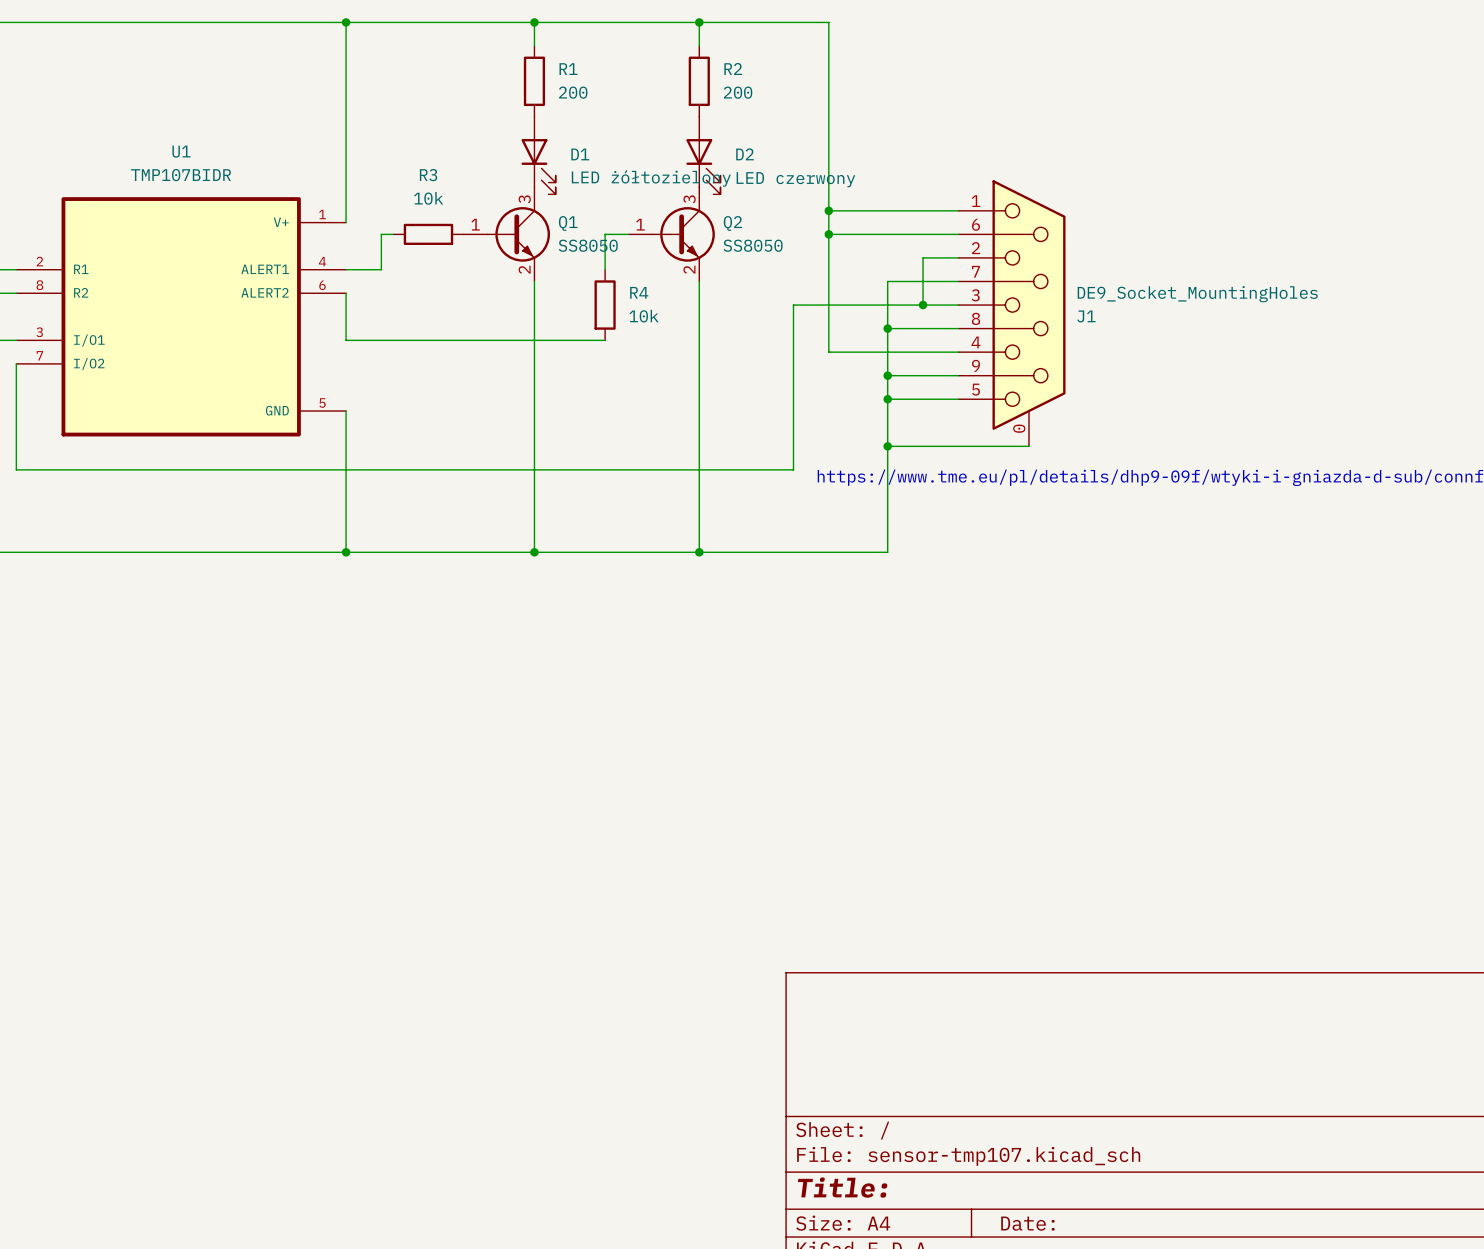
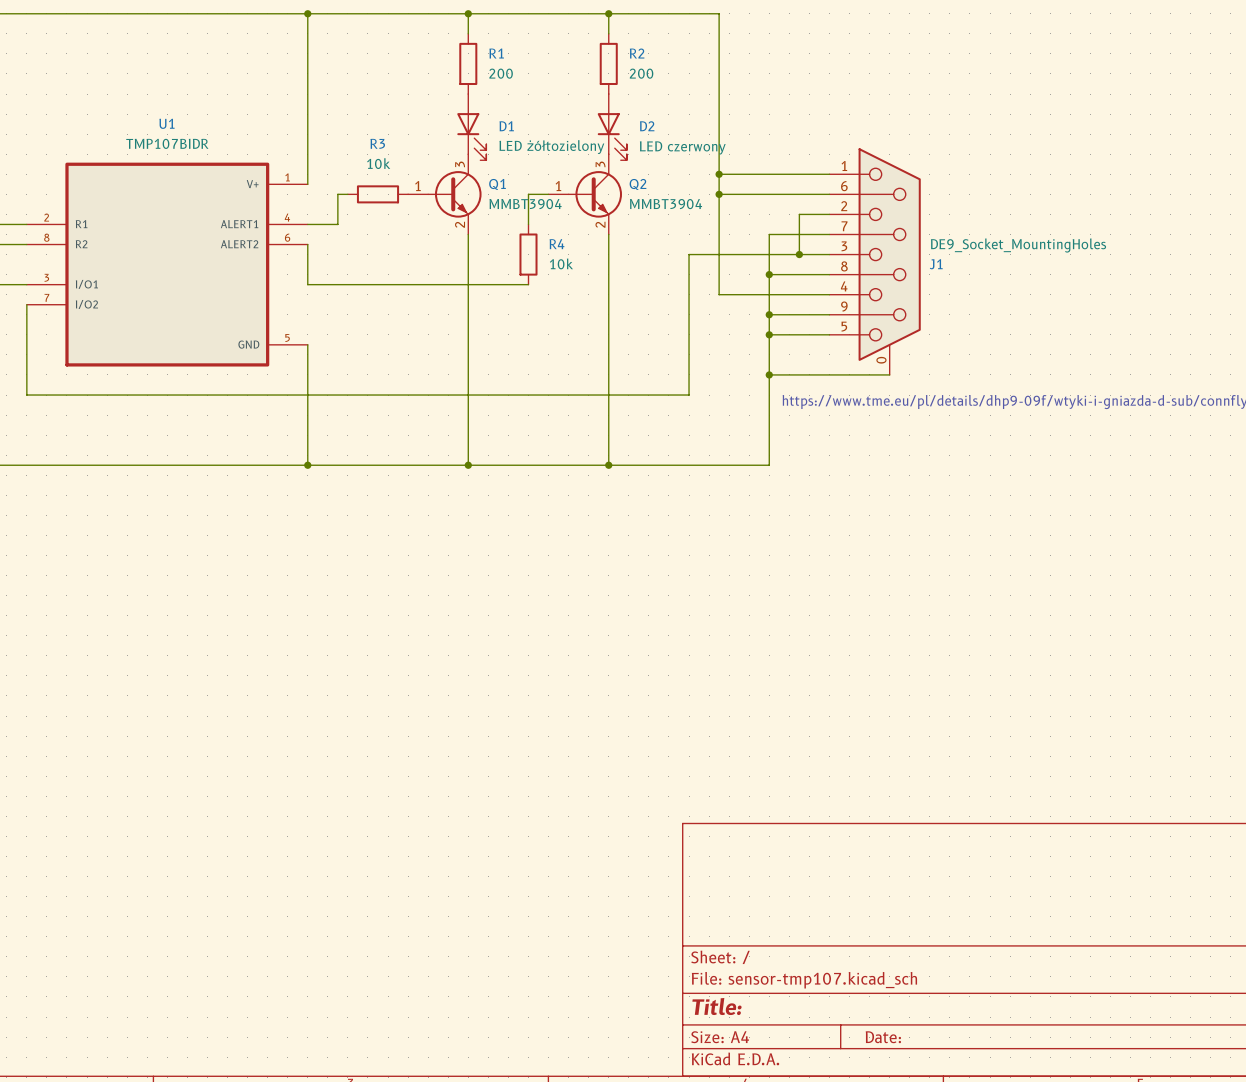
Q1 value: SS8050 (588, 245) -> MMBT3904 (525, 204)
Q2 value: SS8050 (753, 245) -> MMBT3904 (666, 204)

